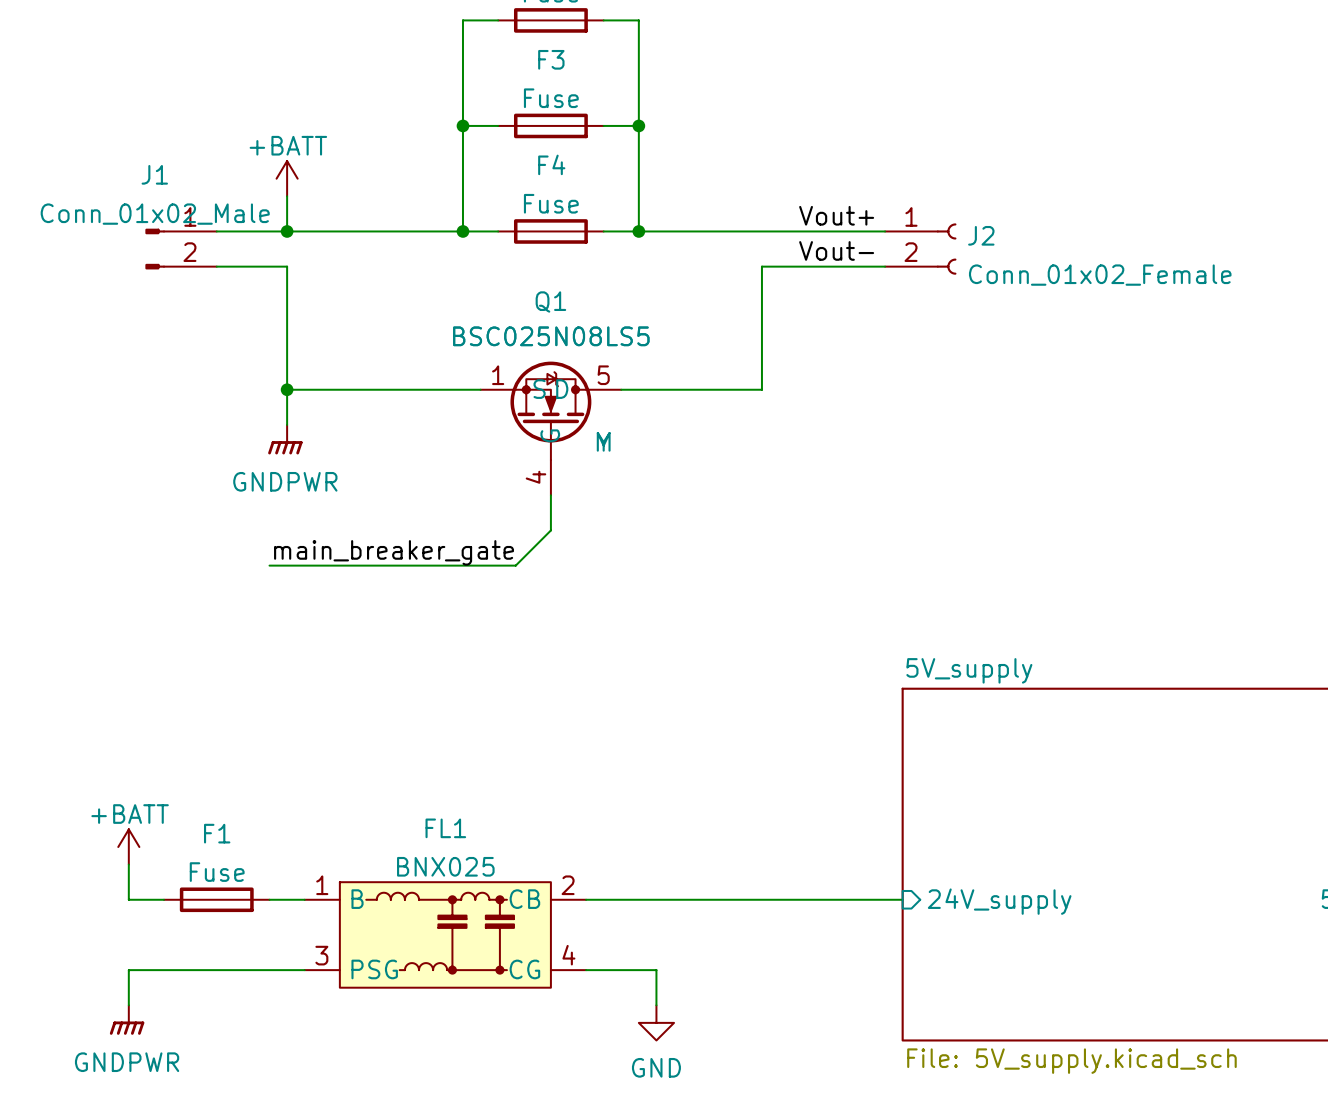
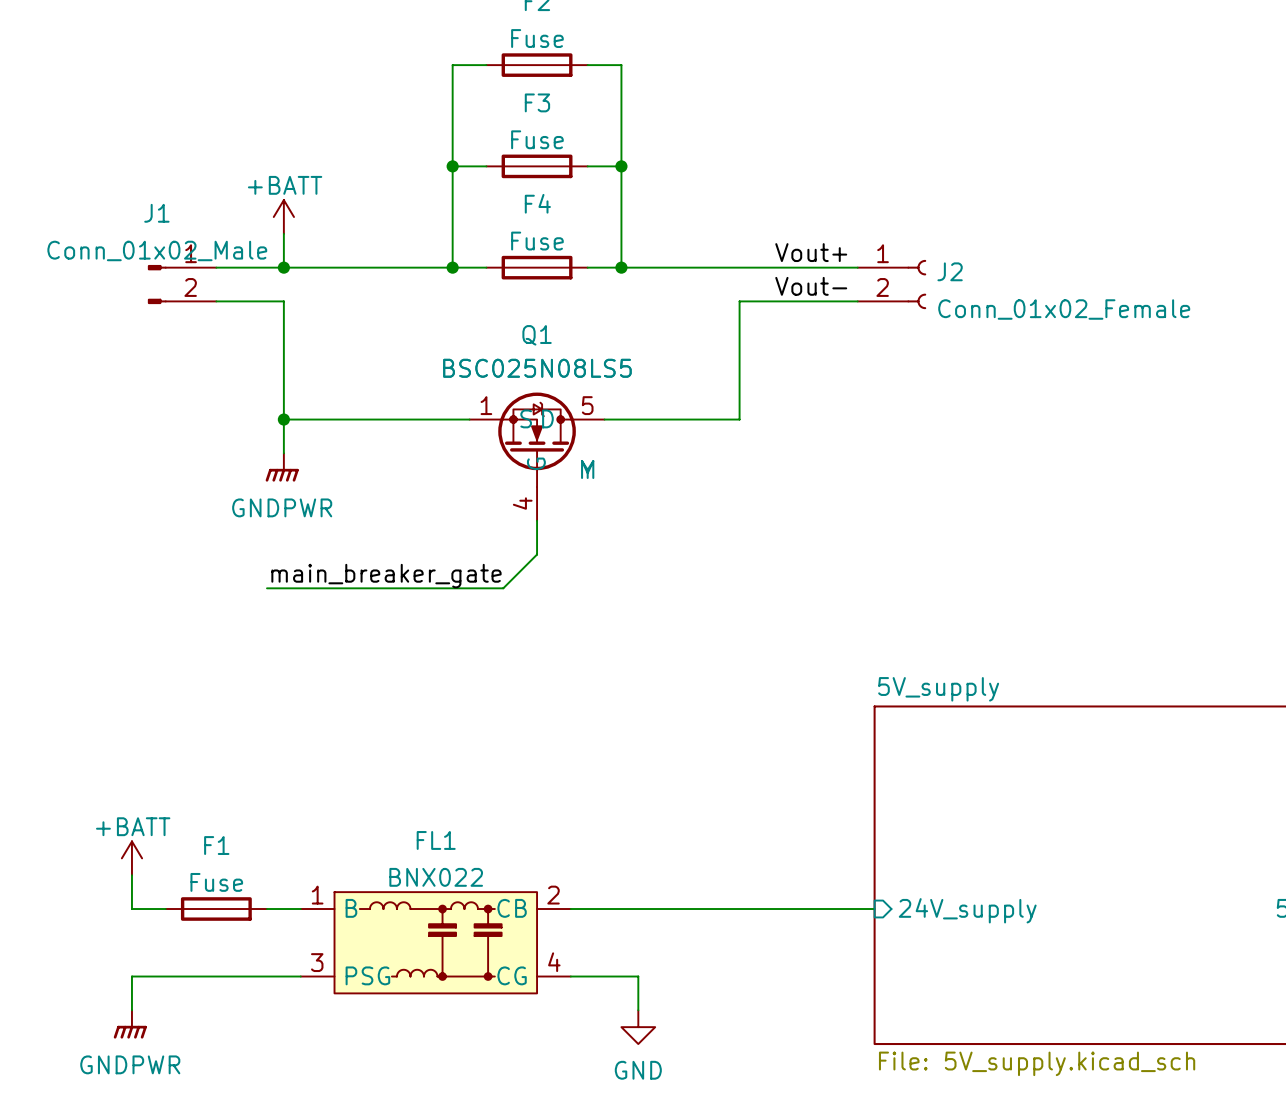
FL1 value: BNX025 (445, 866) -> BNX022 (436, 877)

